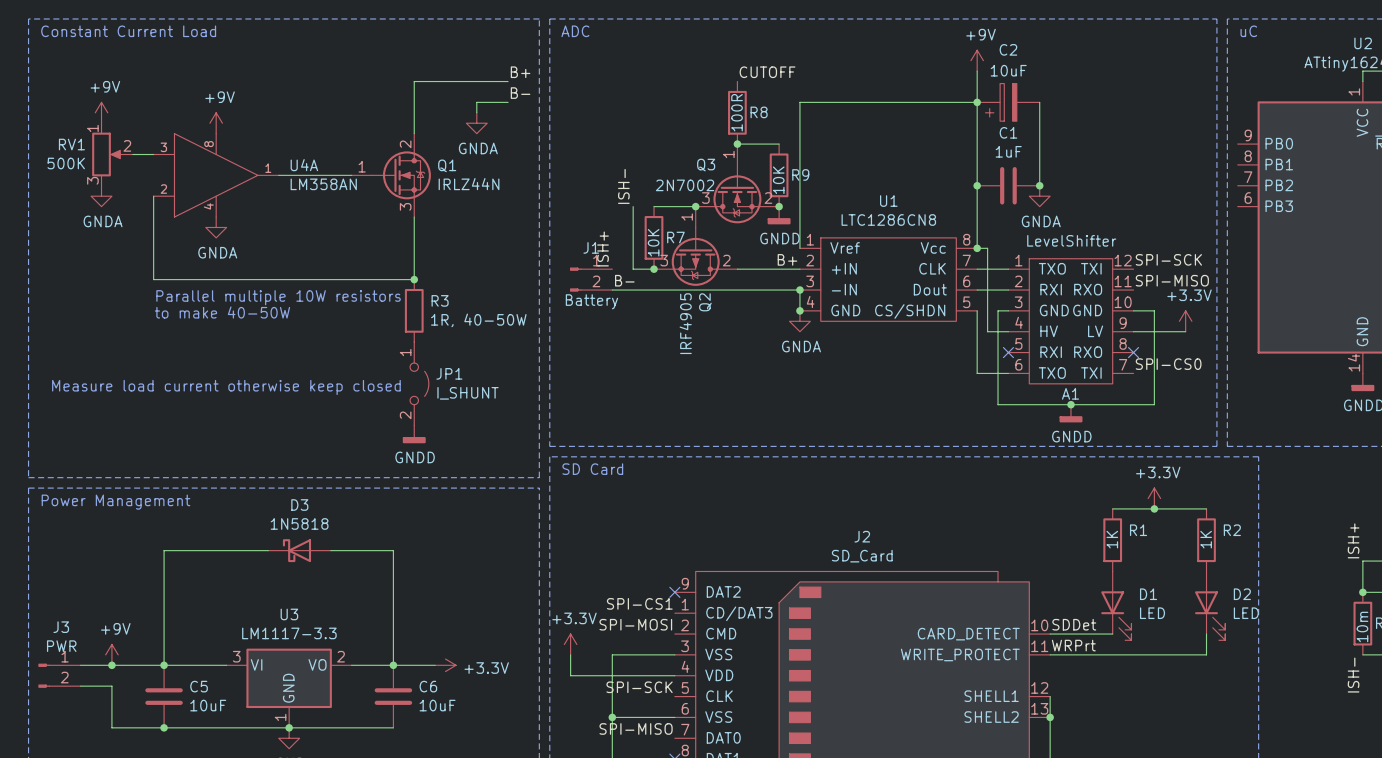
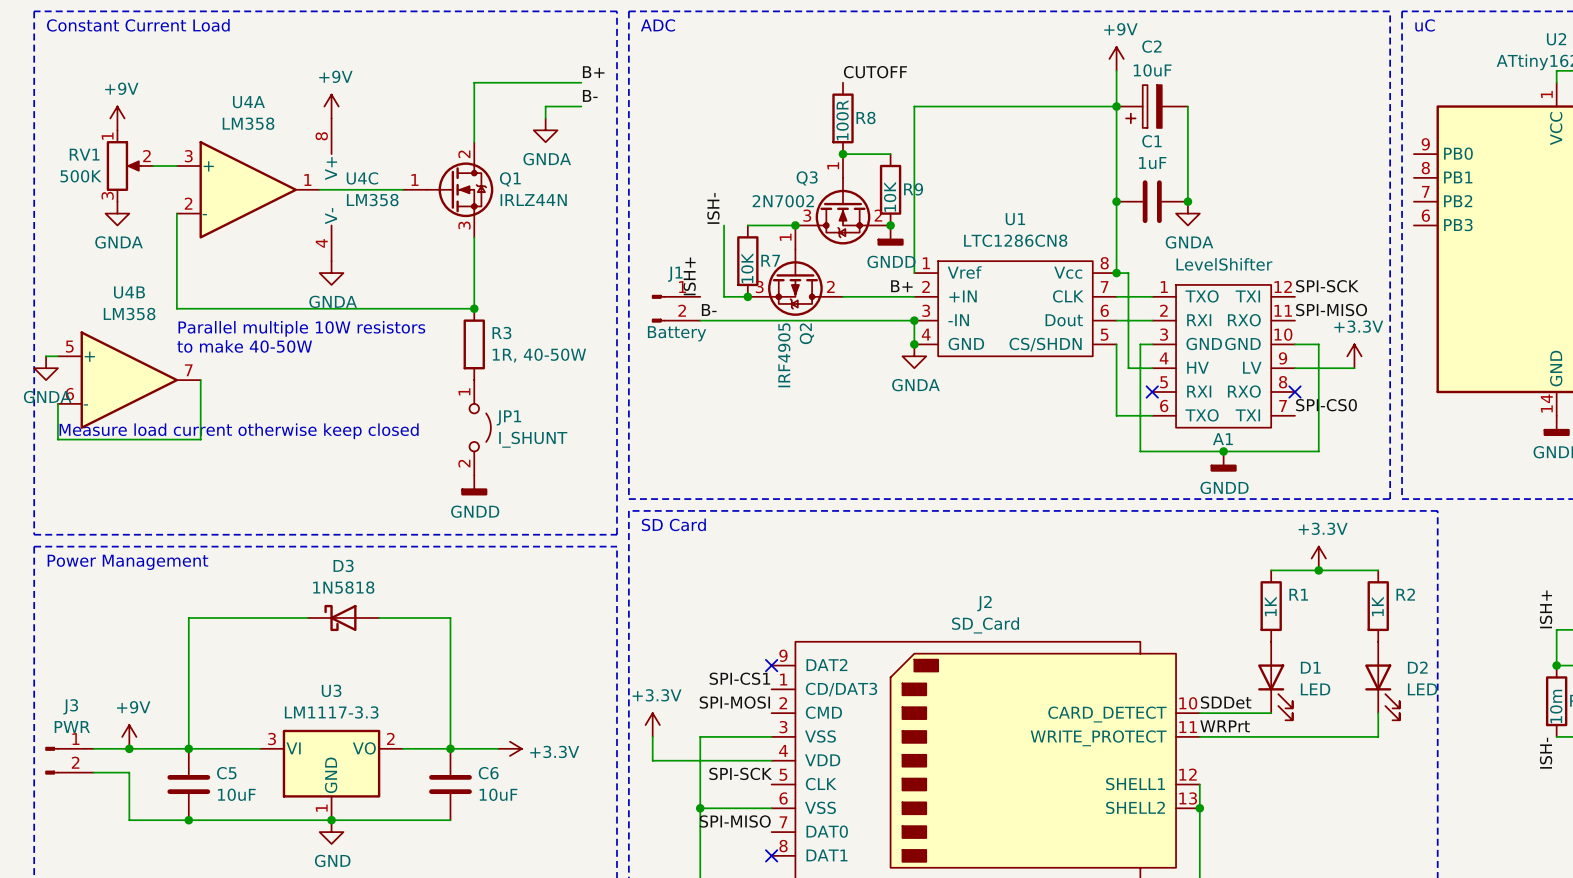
power symbol position: +9V (216, 123) -> +9V (331, 106)
U4A symbol: [153, 133, 279, 218] -> [176, 141, 320, 239]
U4A name position: U4A (304, 165) -> U4A (248, 102)
U4C: none -> LM358 (331, 189)
U4A value: LM358AN (323, 184) -> LM358 (248, 123)
power symbol position: GNDA (216, 227) -> GNDA (331, 273)
wire: none -> (46, 356) (57, 356)
power symbol: none -> GNDA (46, 368)
U4B: none -> LM358 (129, 380)
wire: none -> (200, 380) (200, 439) (57, 439) (57, 403)

